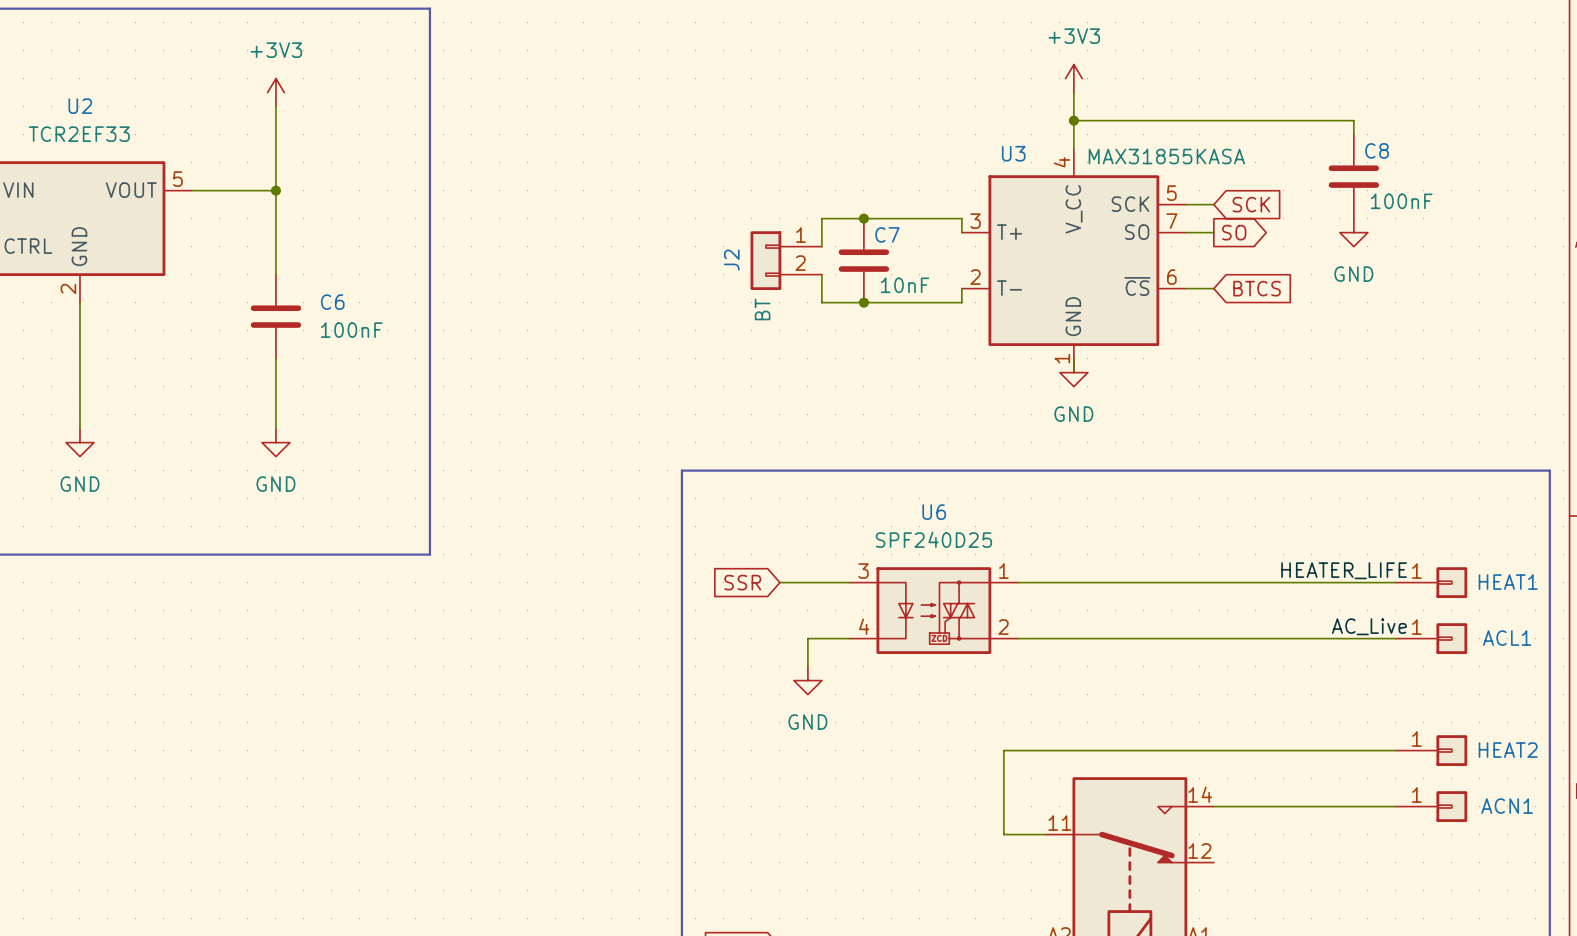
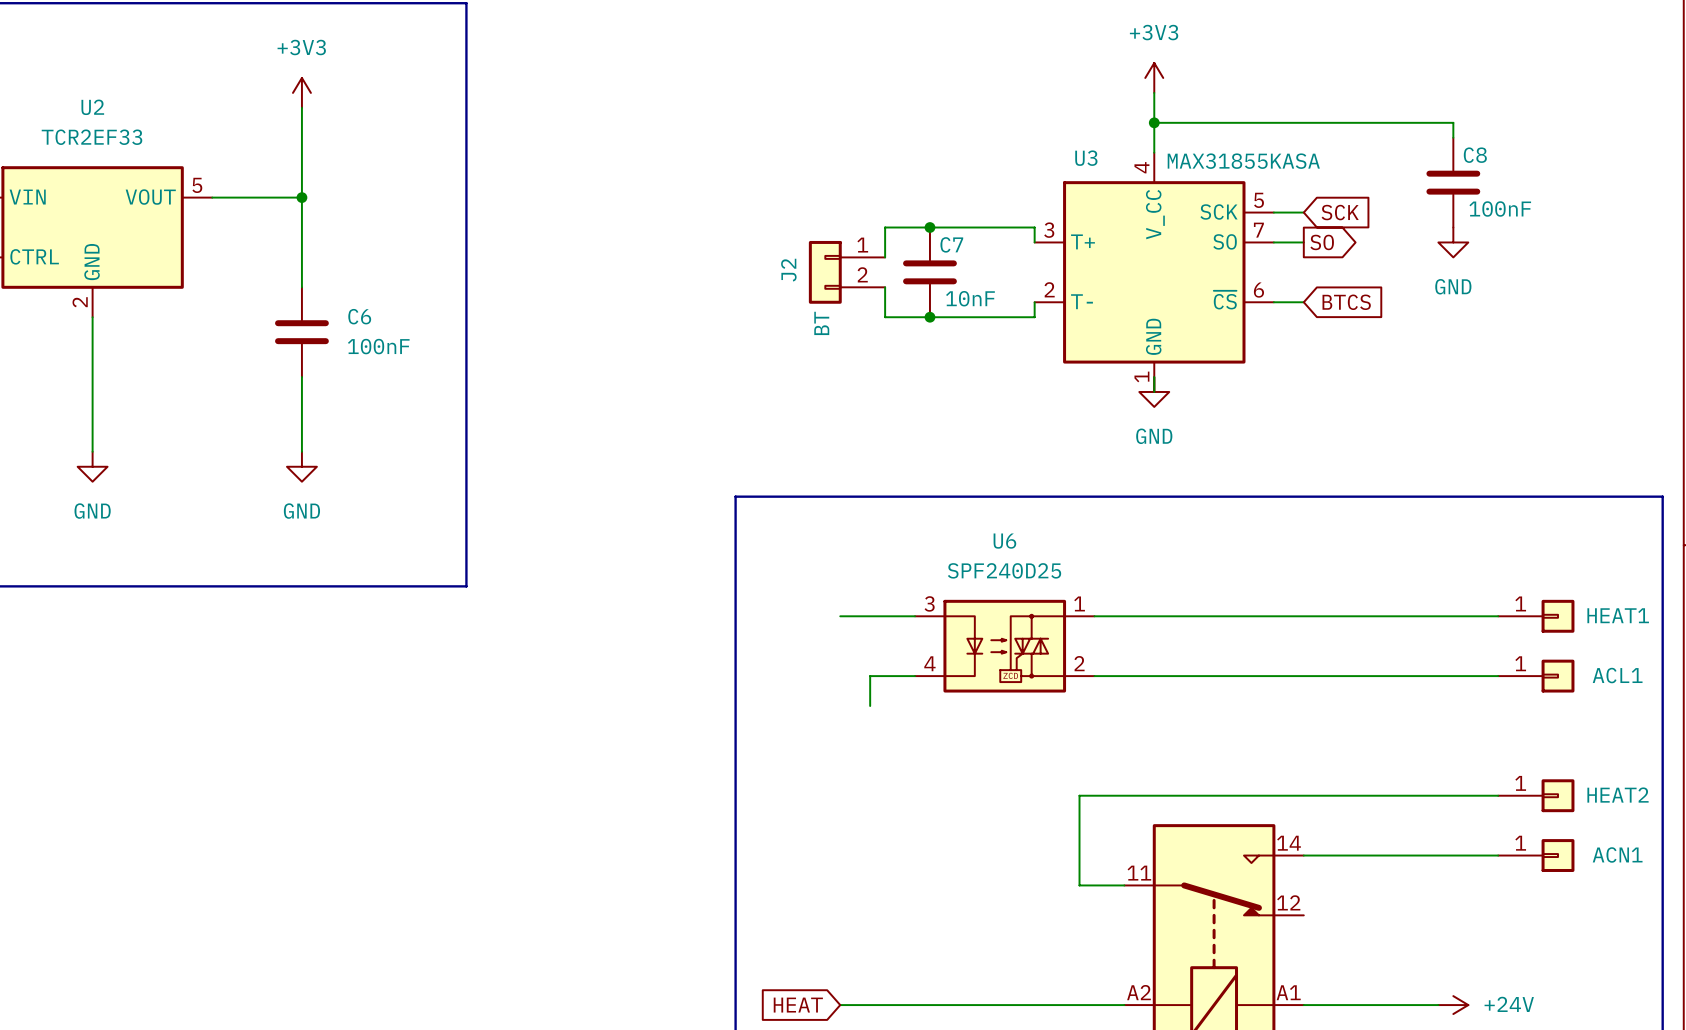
label: HEATER_LIFE (1344, 570) -> none
global label: SSR (742, 582) -> none
label: AC_Live (1369, 626) -> none
power symbol: GND (807, 680) -> none

